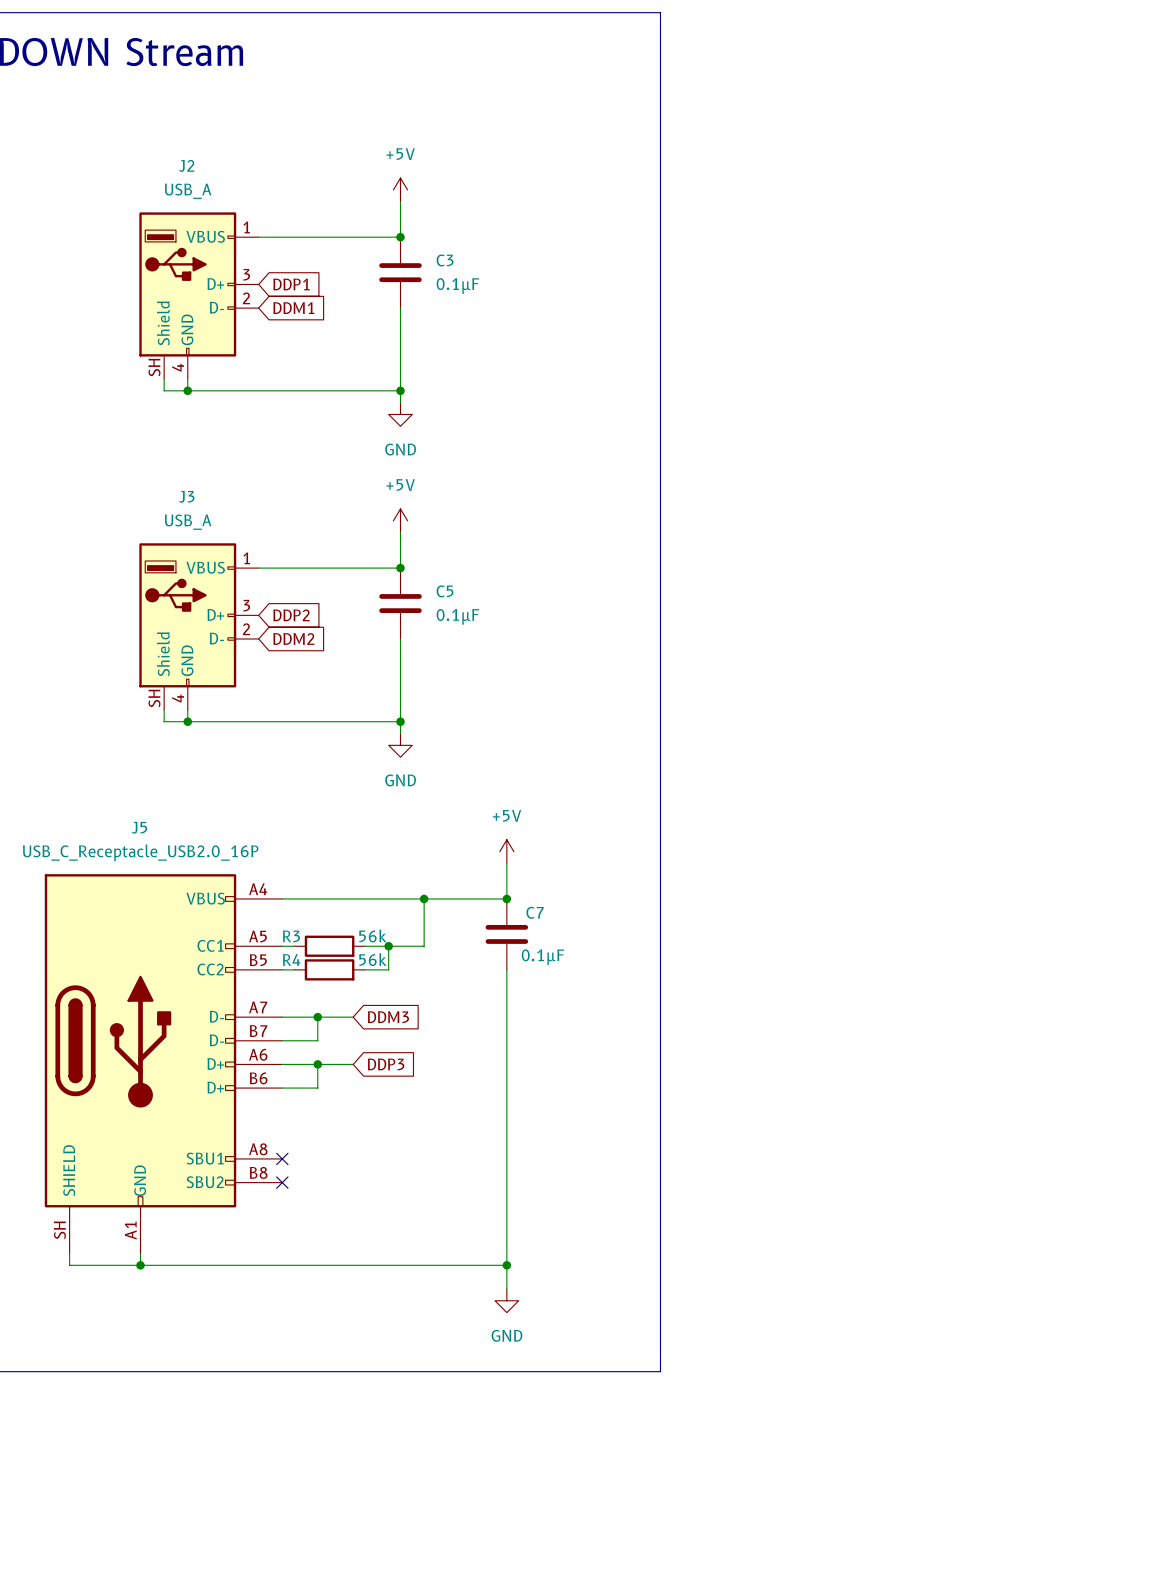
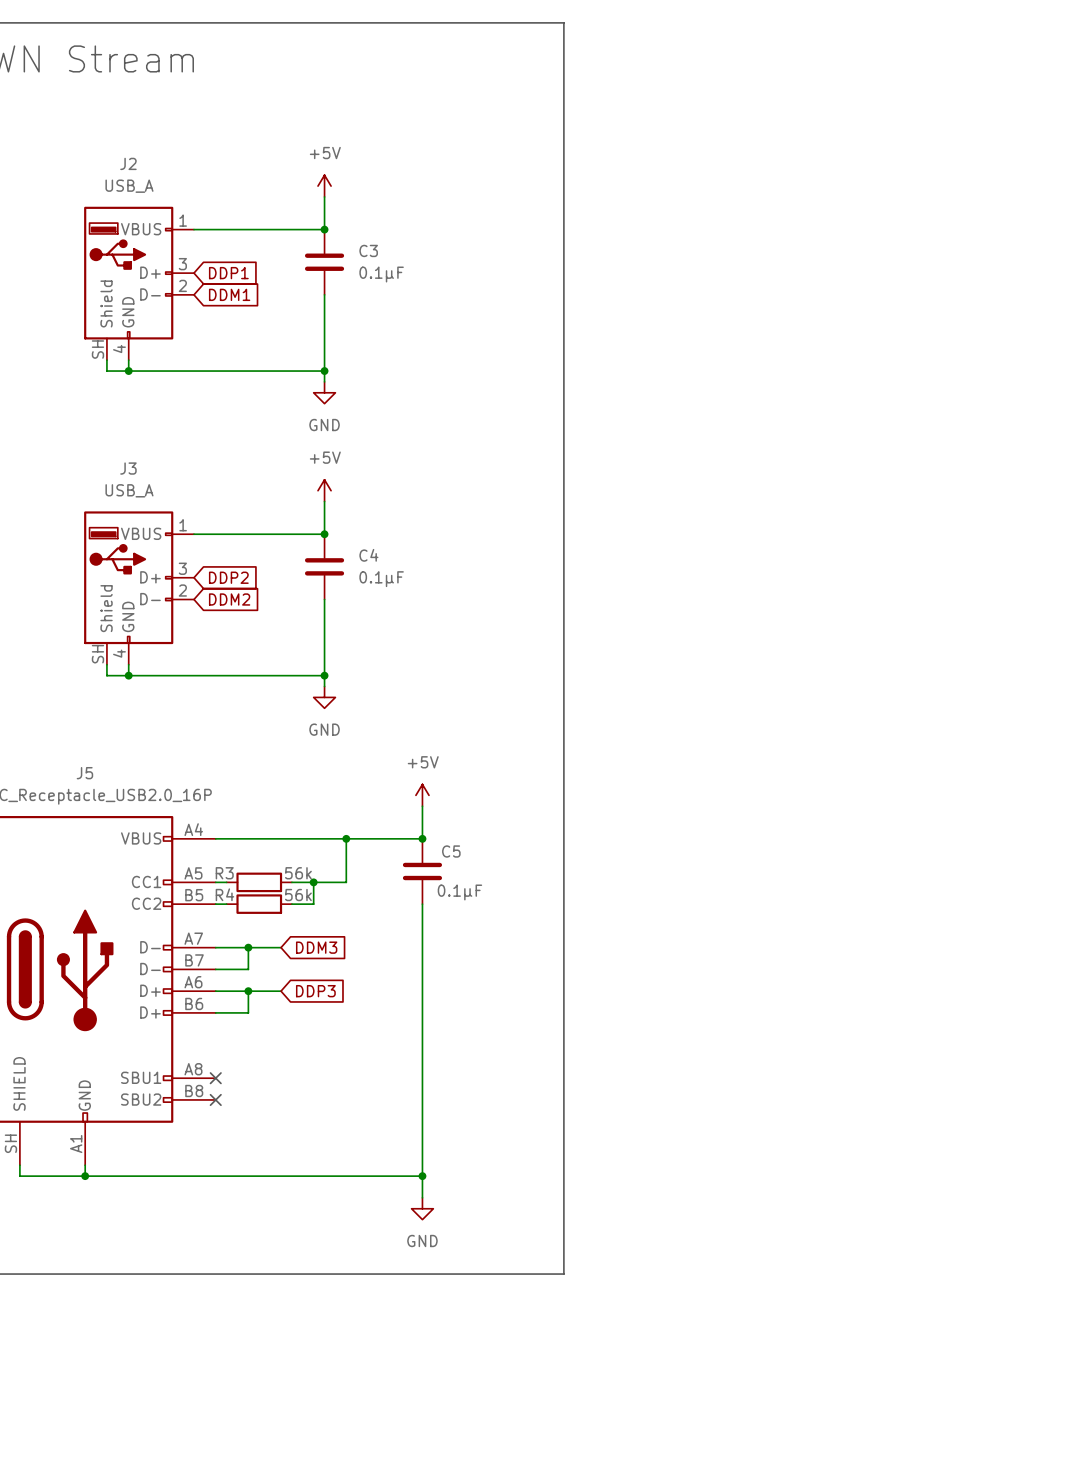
C5 name: C5 (445, 591) -> C4 (368, 555)
C7 name: C7 (535, 912) -> C5 (451, 851)

